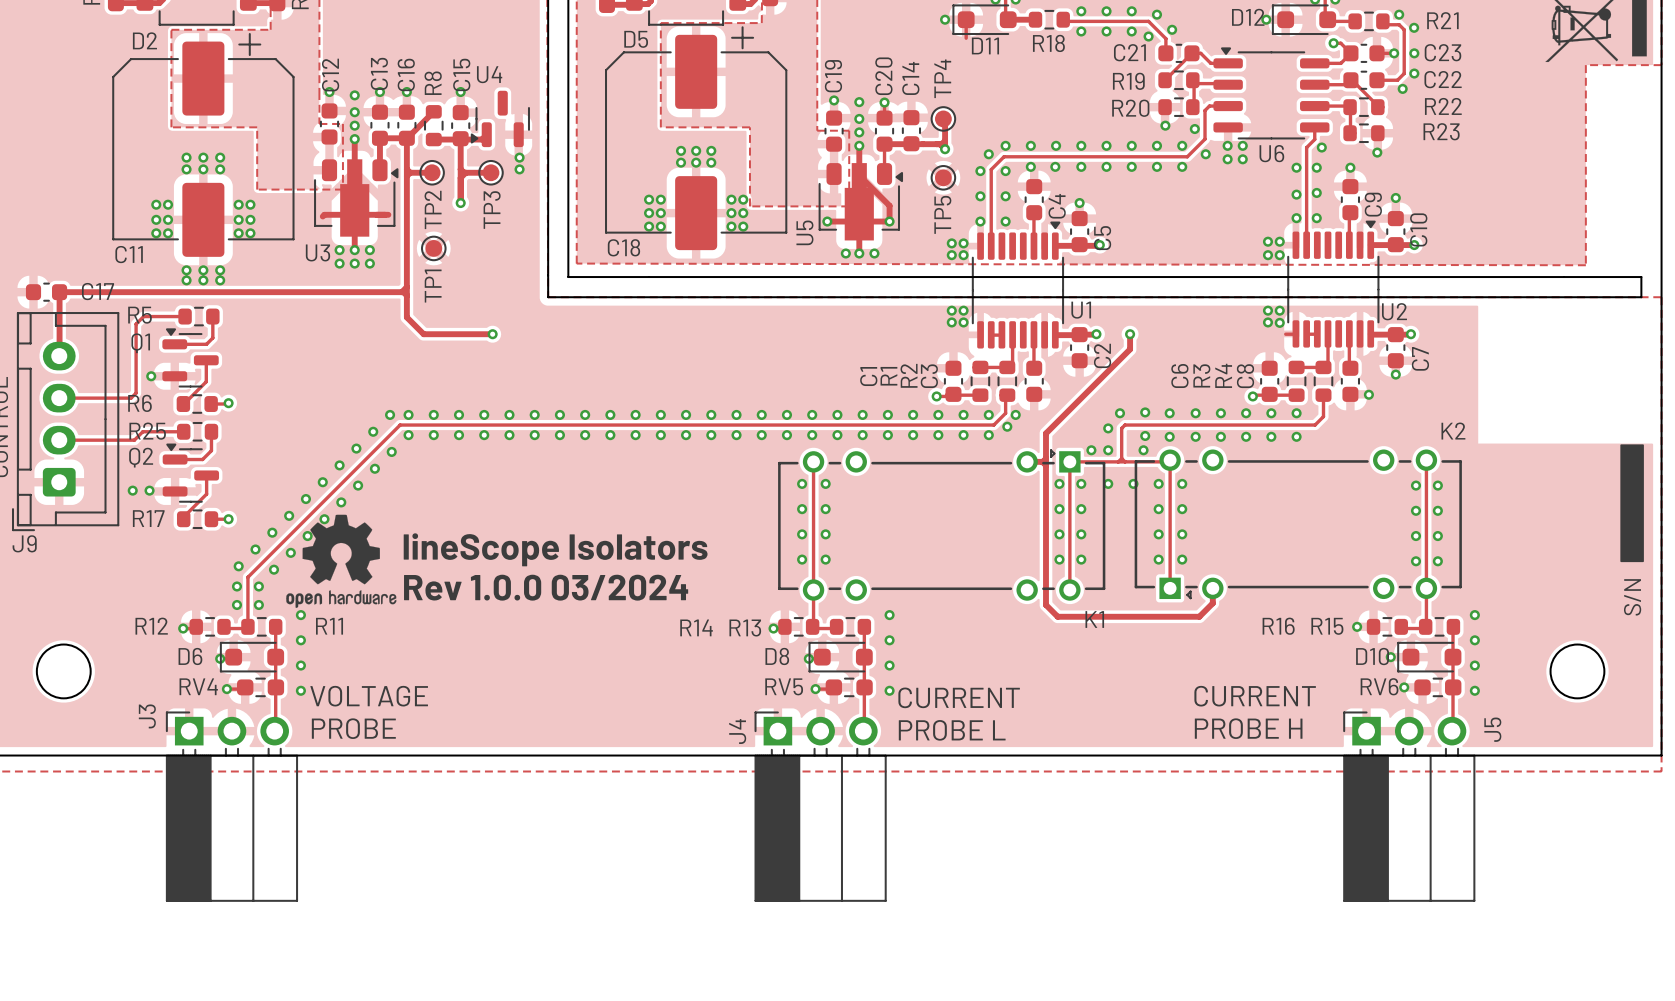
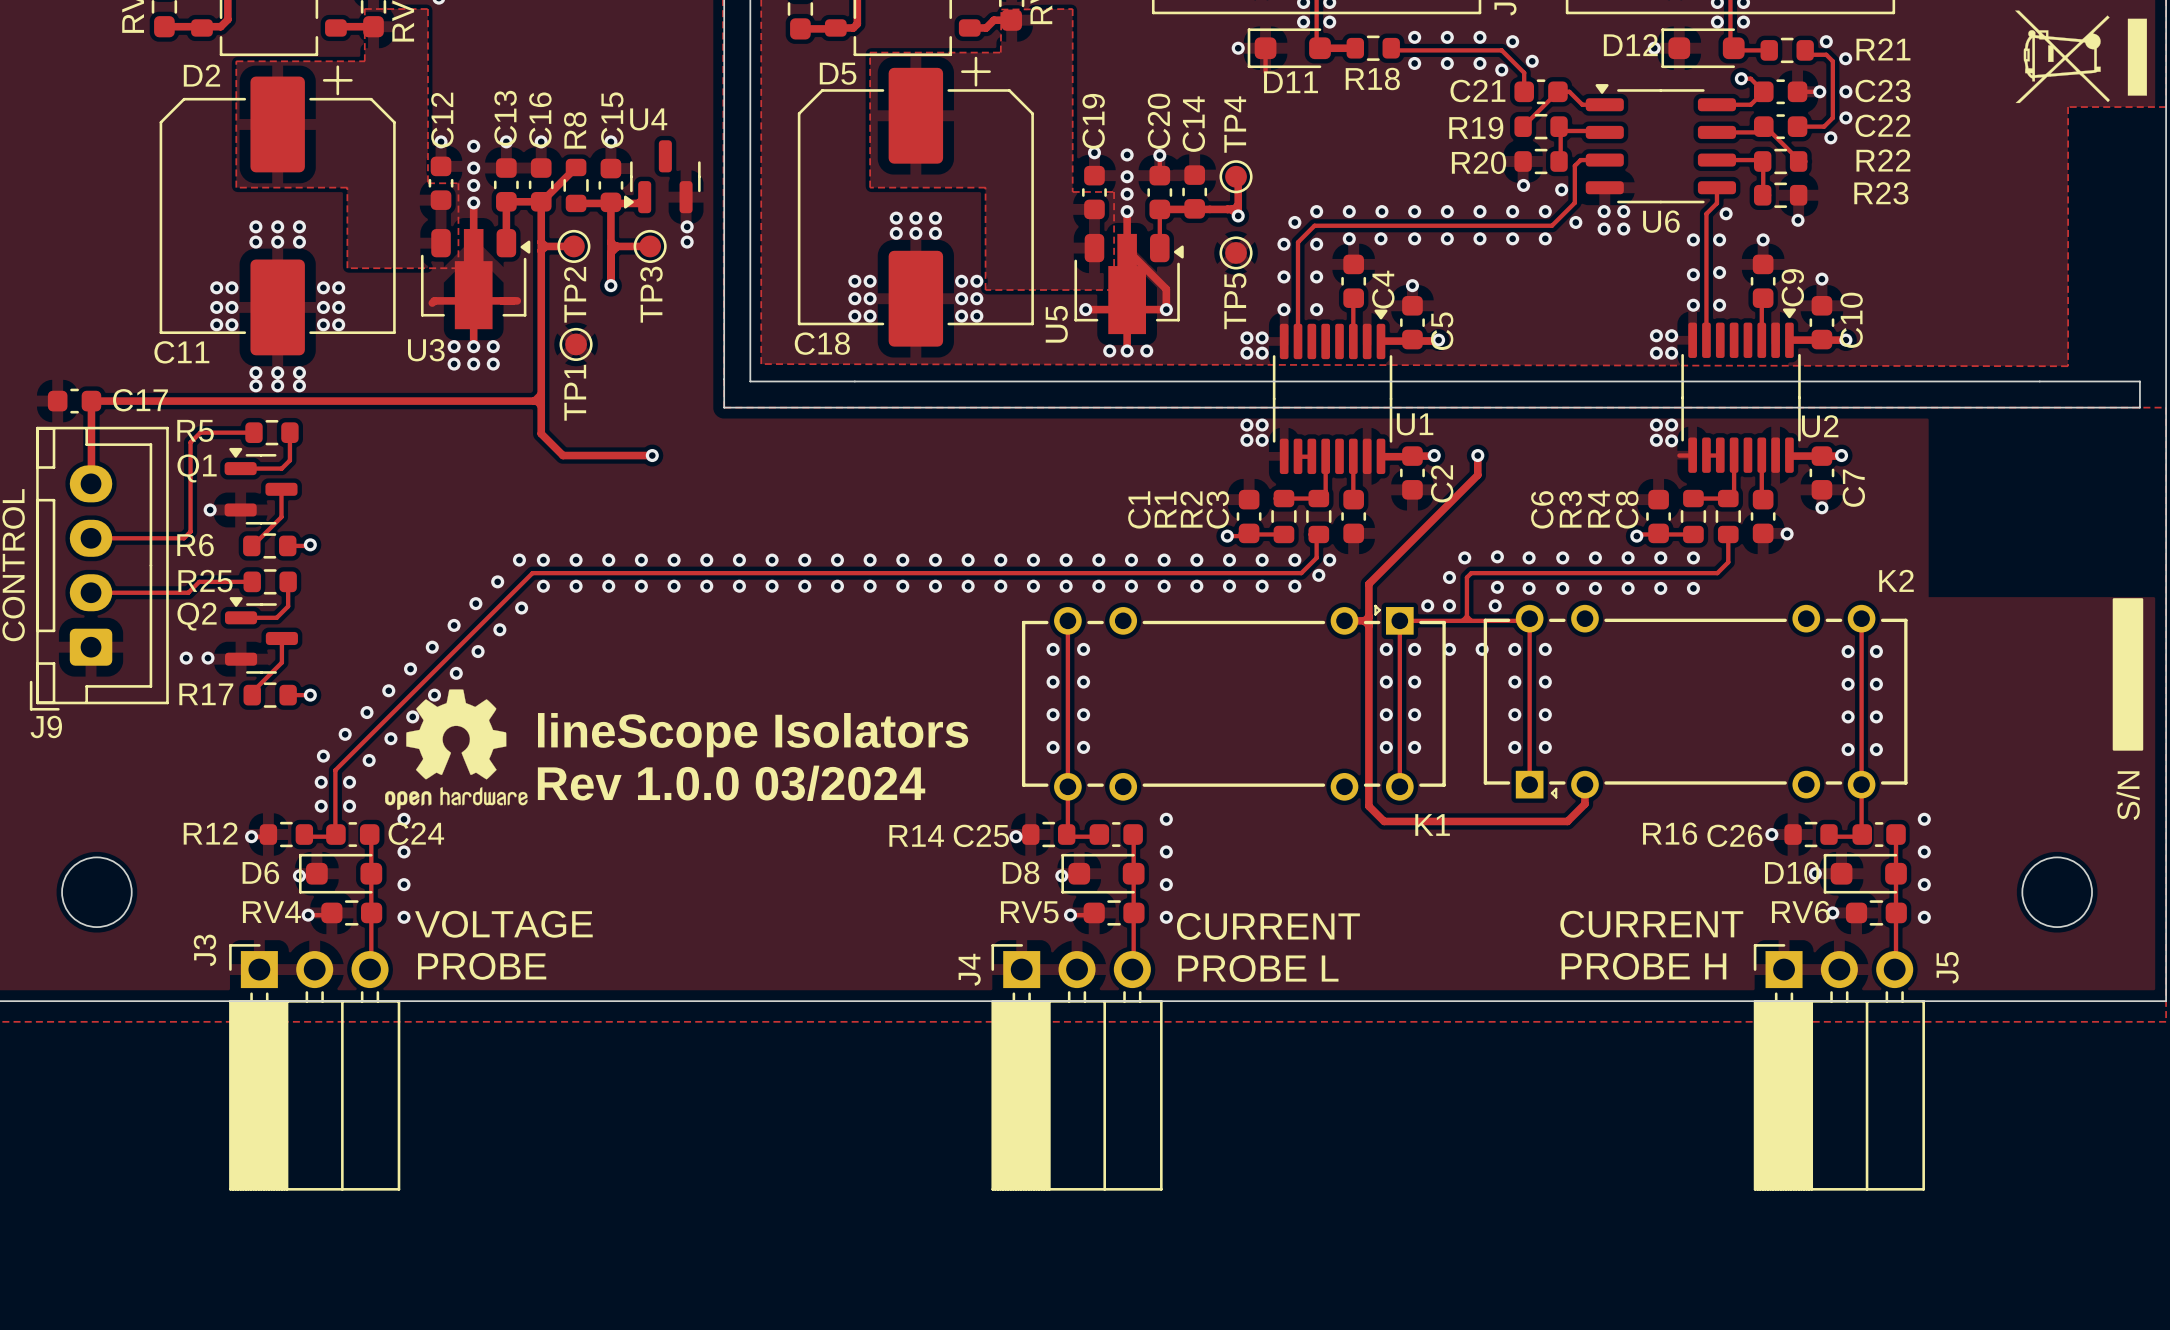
R11: (261, 626) -> none
C24: none -> (352, 834)
R13: (850, 626) -> none
C25: none -> (1116, 834)
R15: (1439, 626) -> none
C26: none -> (1879, 834)

